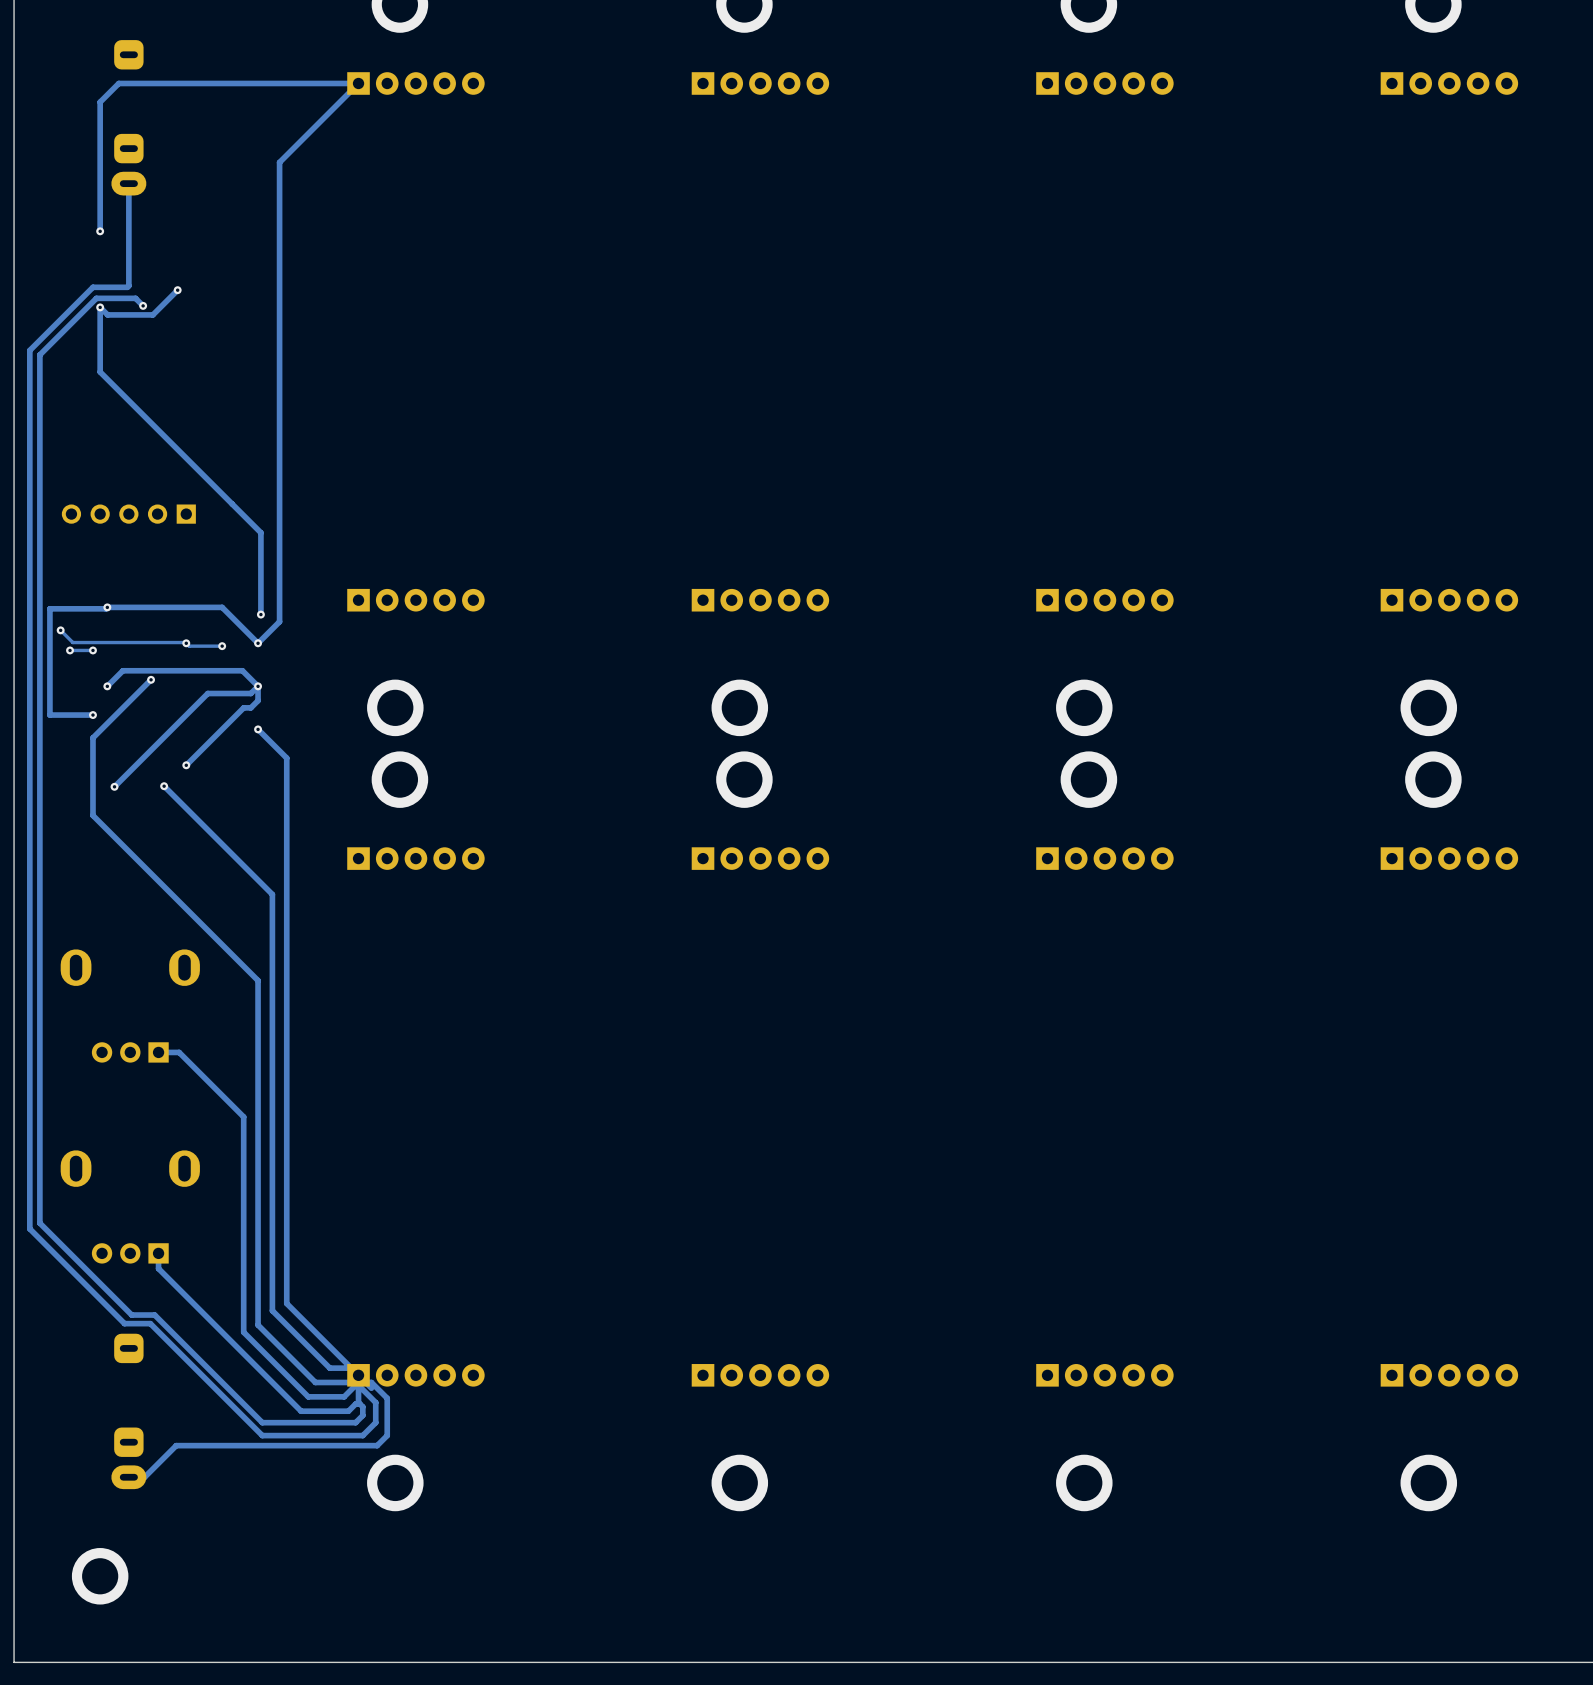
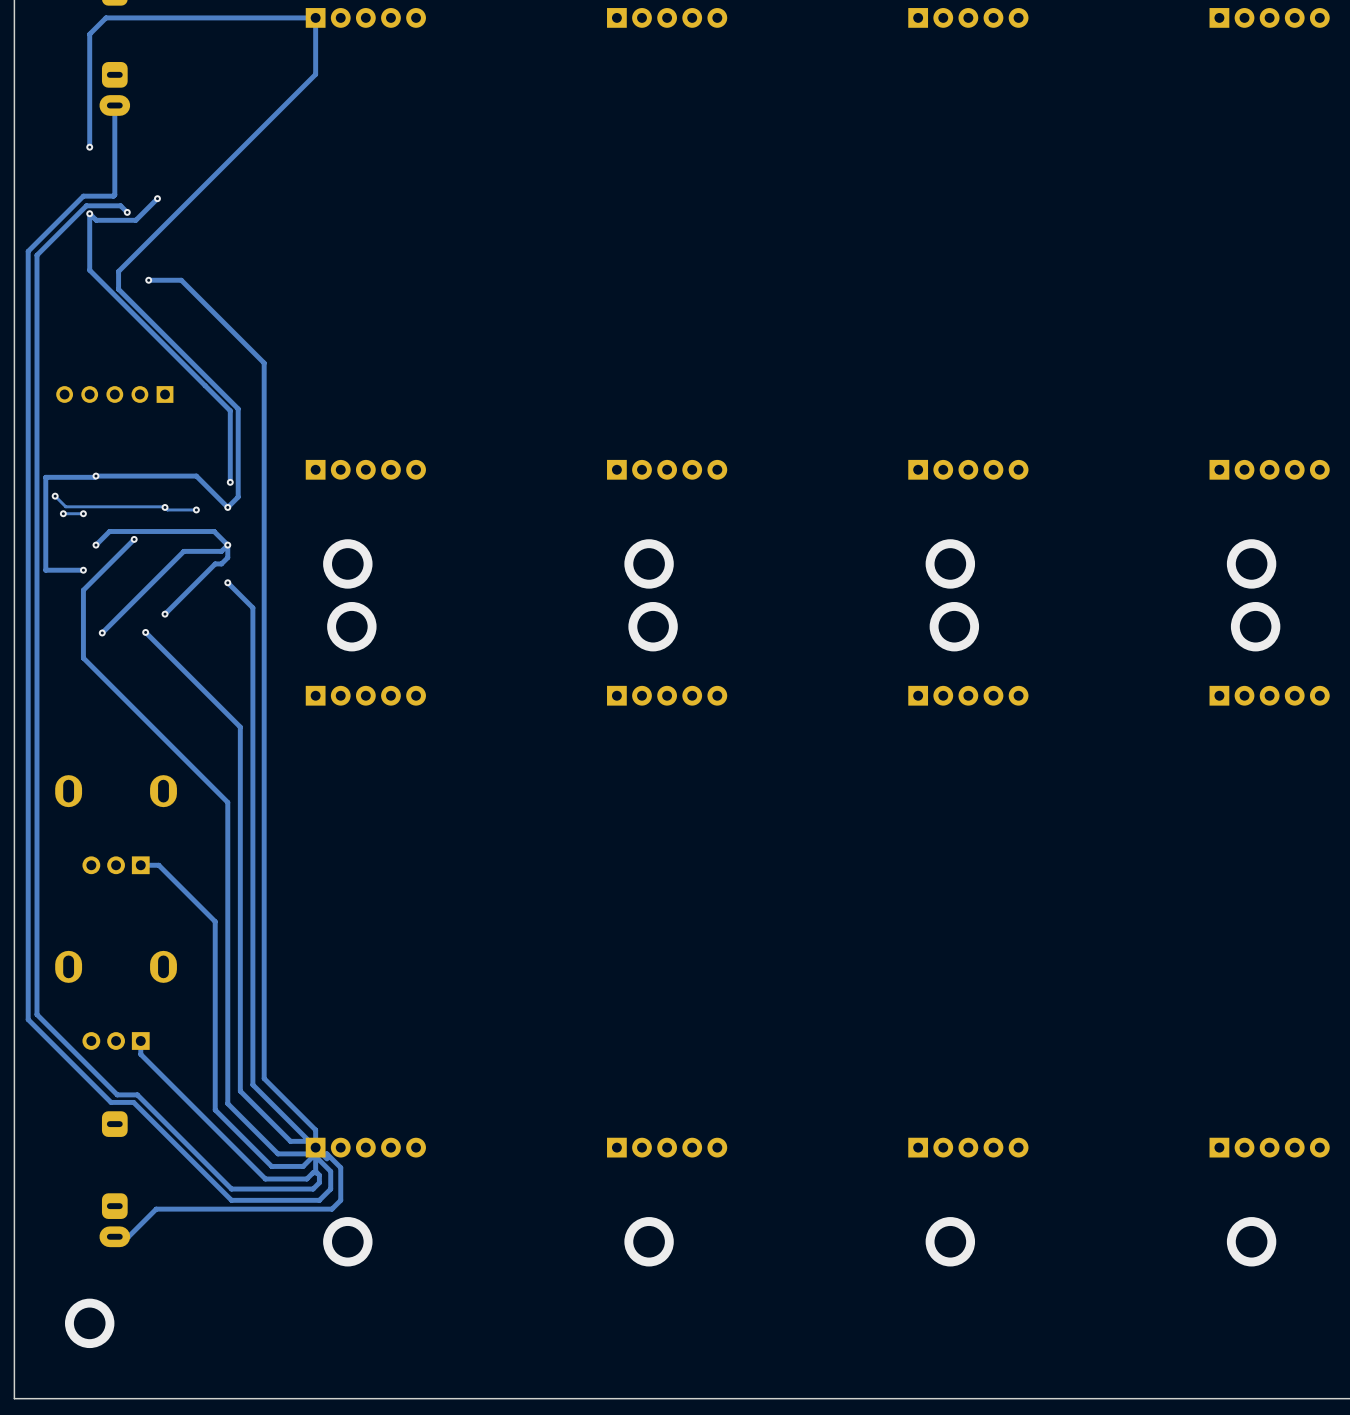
track: (358, 83) (279, 162) (279, 621) (269, 631) -> (315, 17) (315, 74) (118, 271) (118, 289) (238, 408) (238, 497)
track: none -> (148, 280) (181, 280) (264, 363) (264, 1078) (315, 1130) (315, 1147)
via: none -> (148, 280)

